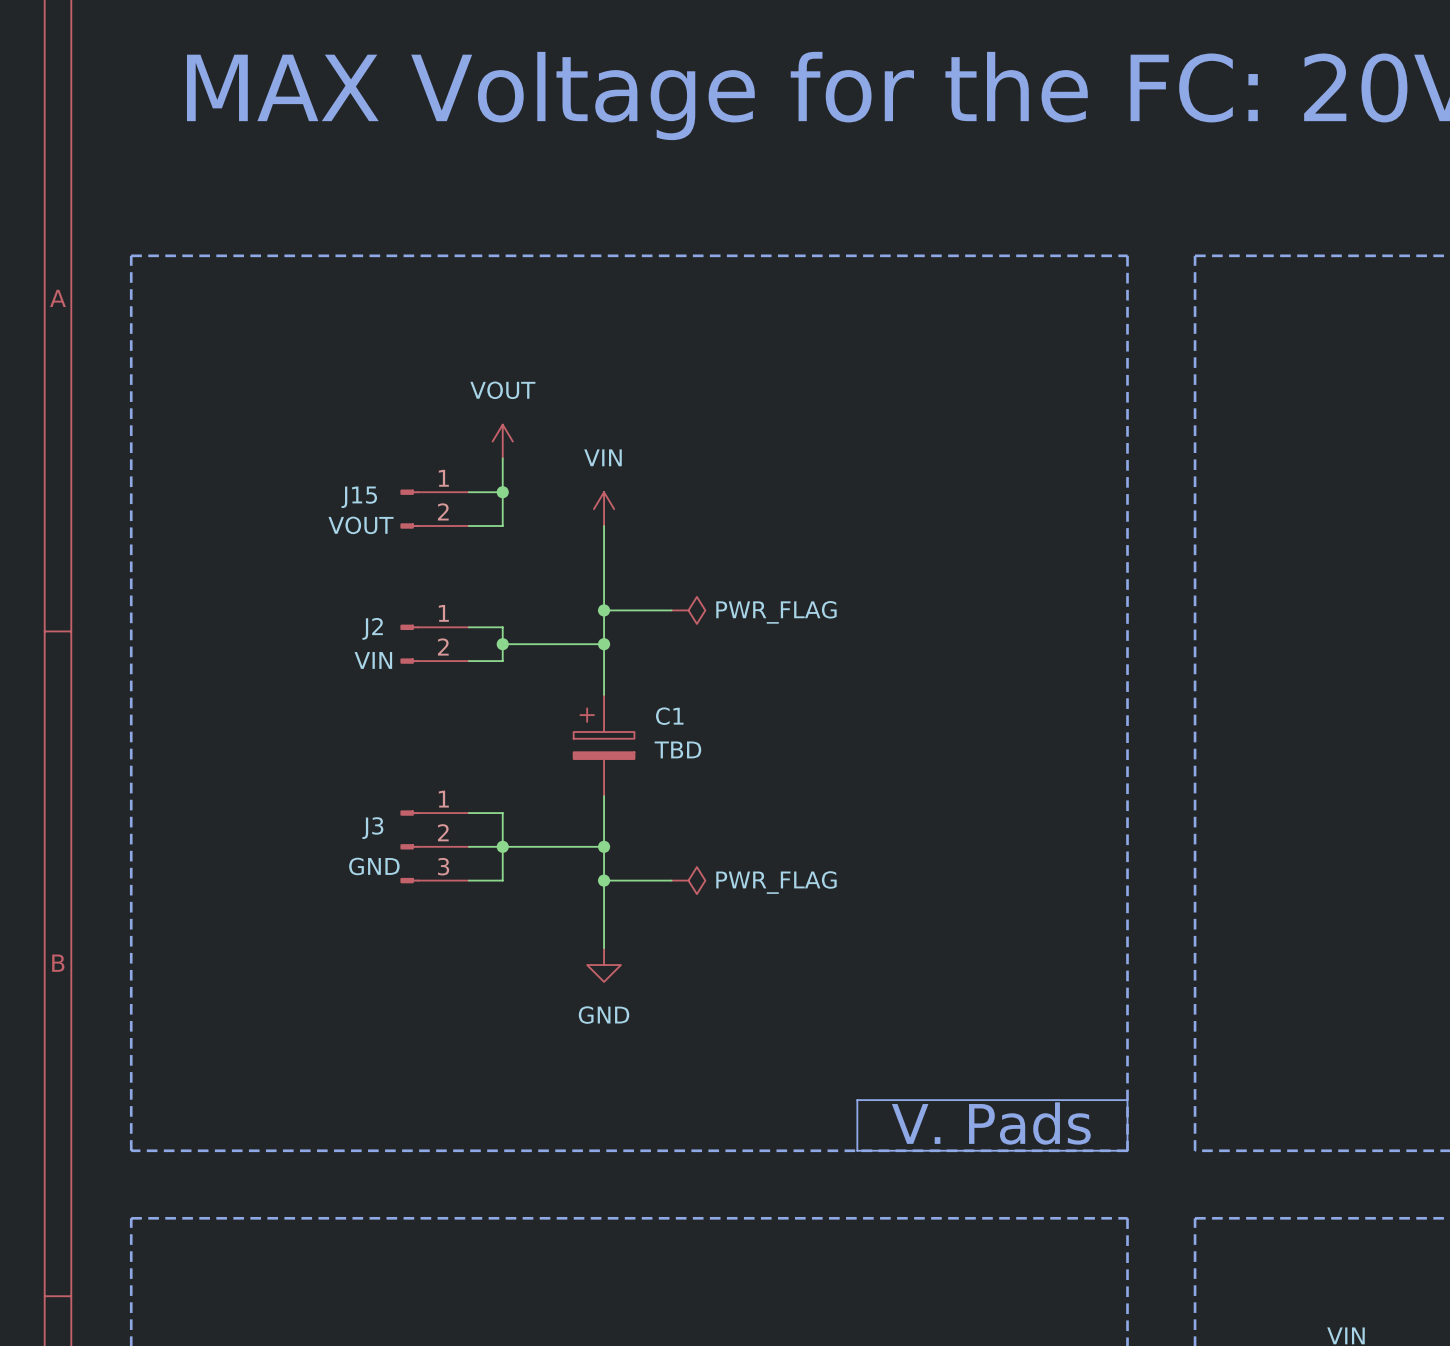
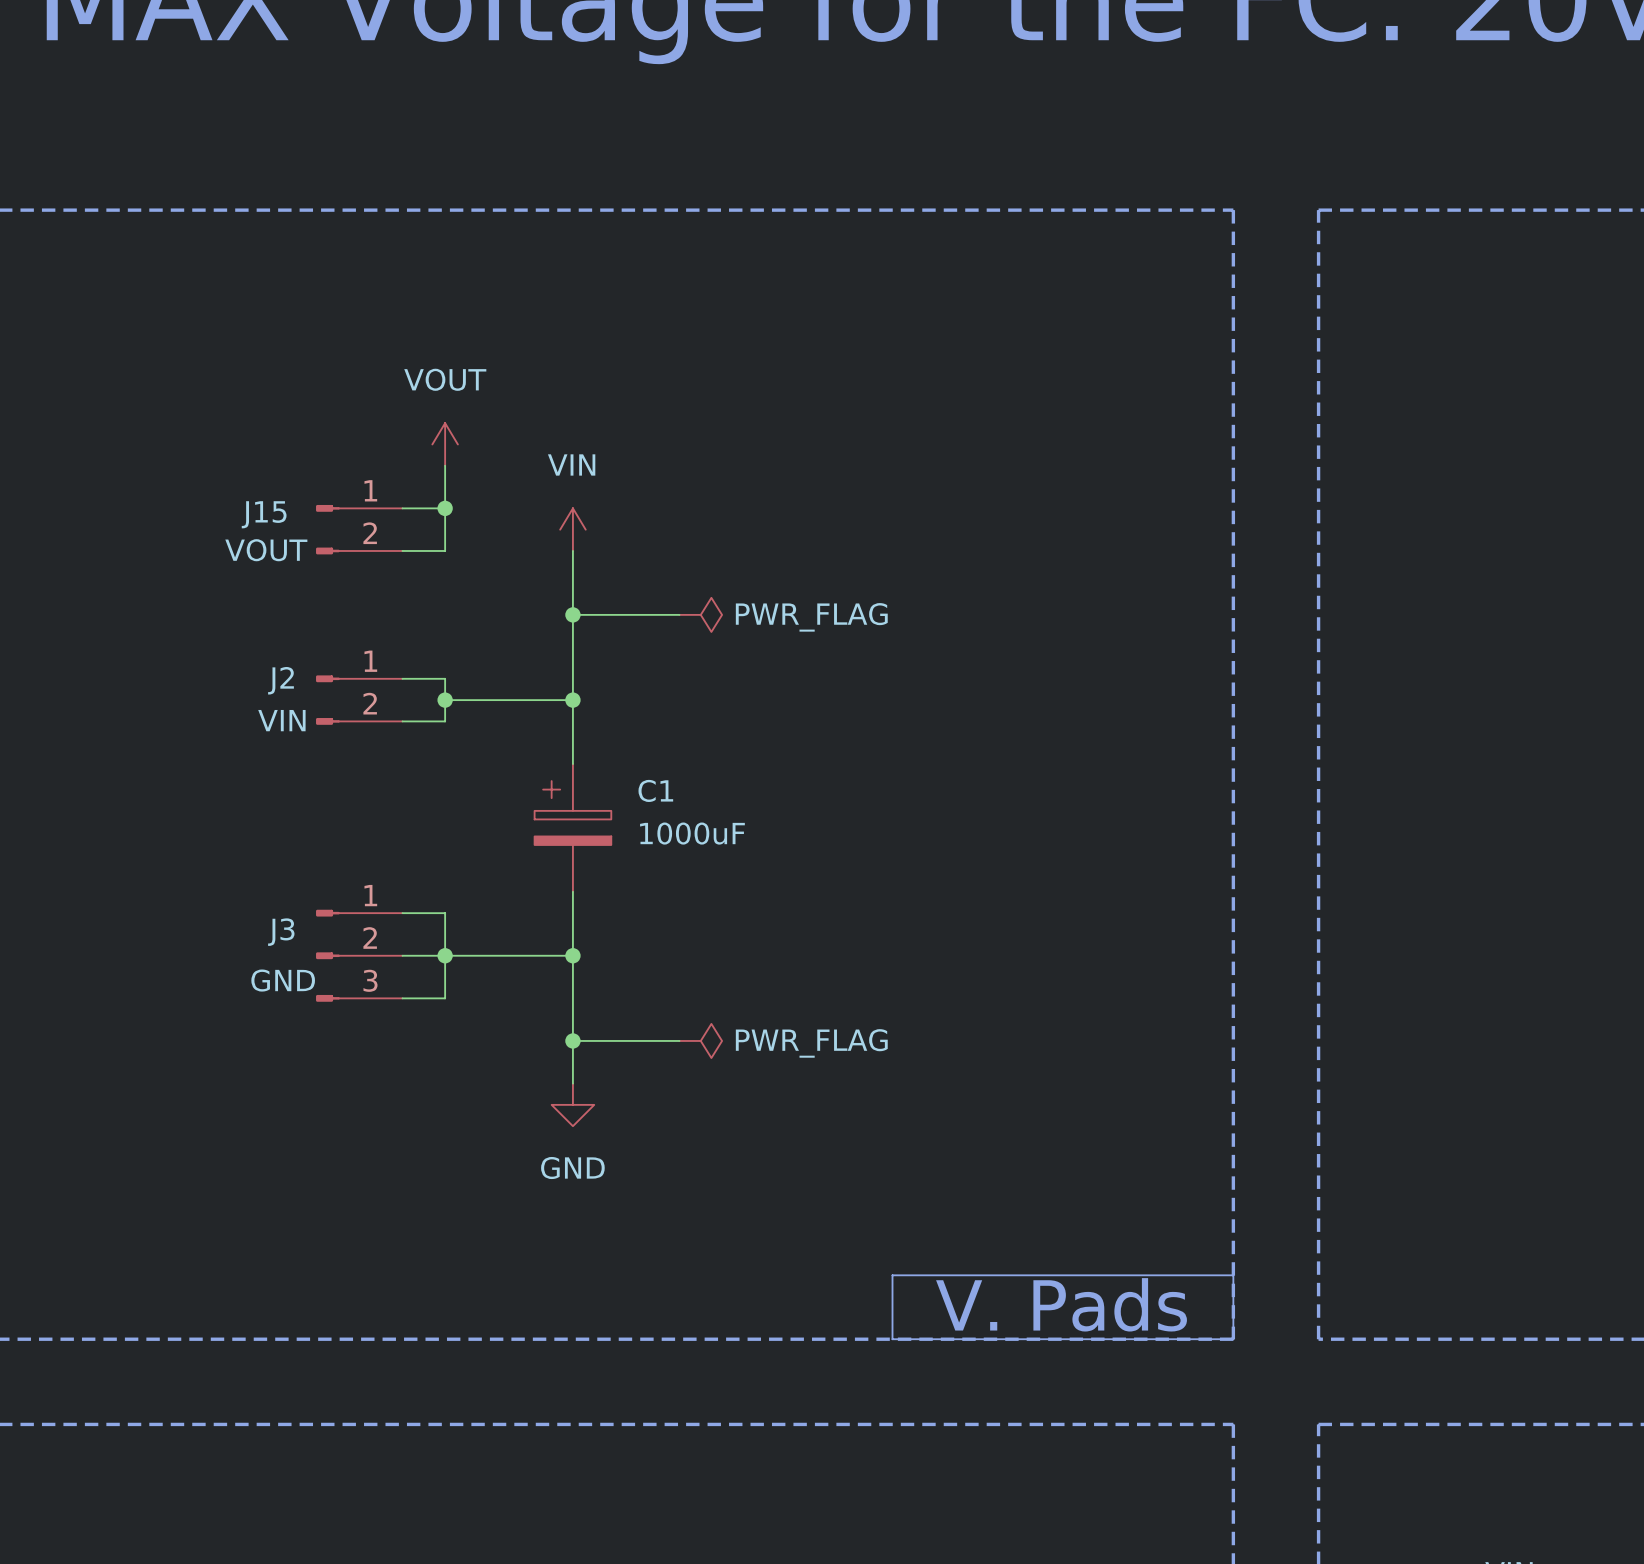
wire: none -> (572, 614) (679, 614)
wire: (604, 610) (671, 610) -> none
junction position: (604, 610) -> (572, 614)
power symbol position: PWR_FLAG (688, 610) -> PWR_FLAG (700, 614)
C1 value: TBD (677, 749) -> 1000uF (692, 833)
wire: (604, 880) (671, 880) -> none
junction position: (604, 880) -> (572, 1040)
power symbol position: PWR_FLAG (688, 880) -> PWR_FLAG (700, 1040)
wire: none -> (572, 1040) (679, 1040)

